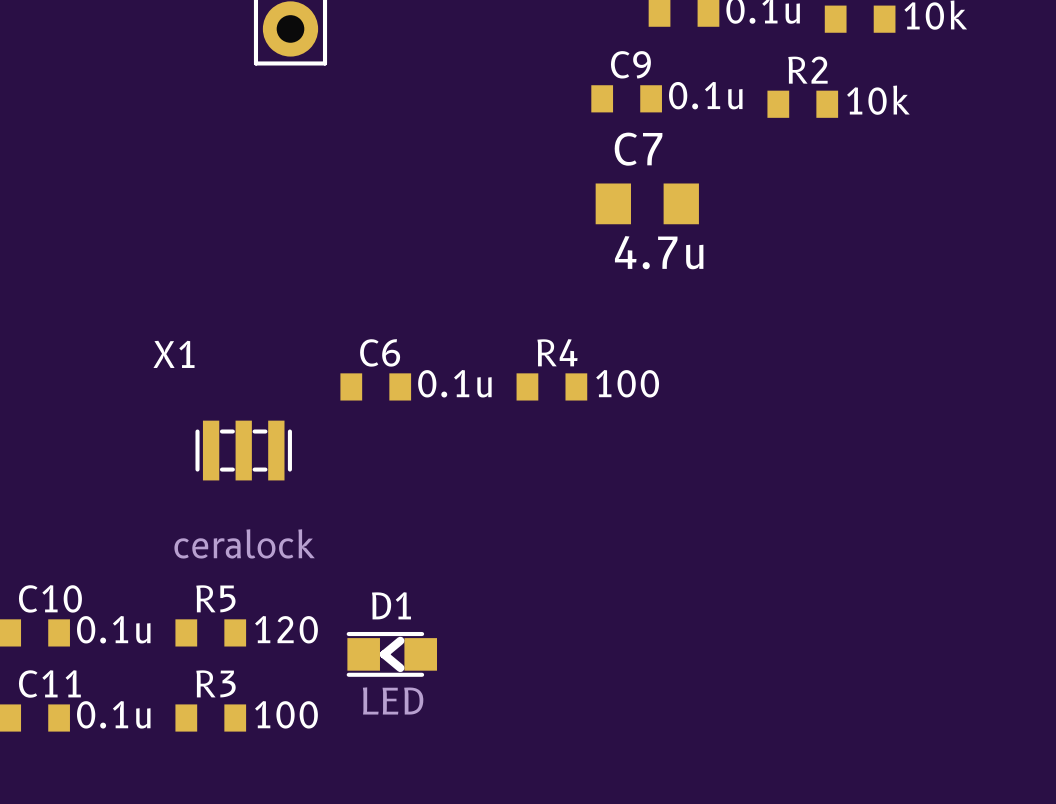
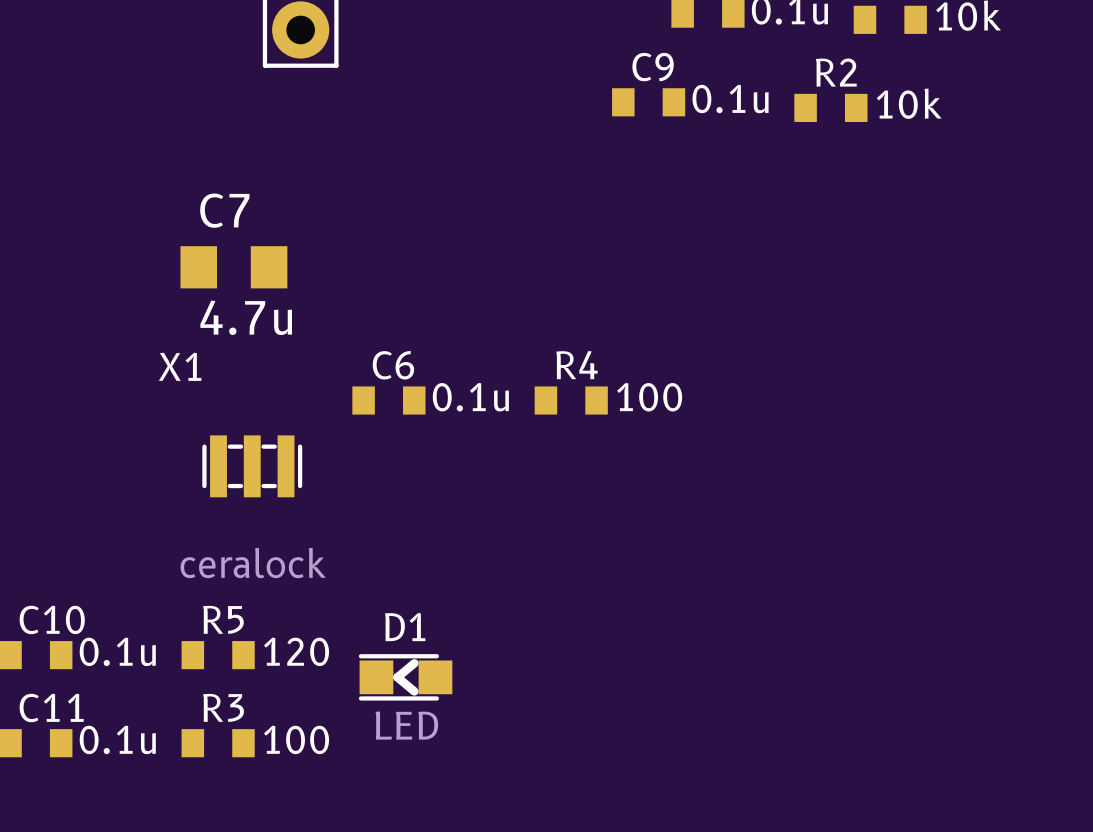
C7 position: (647, 203) -> (233, 267)

